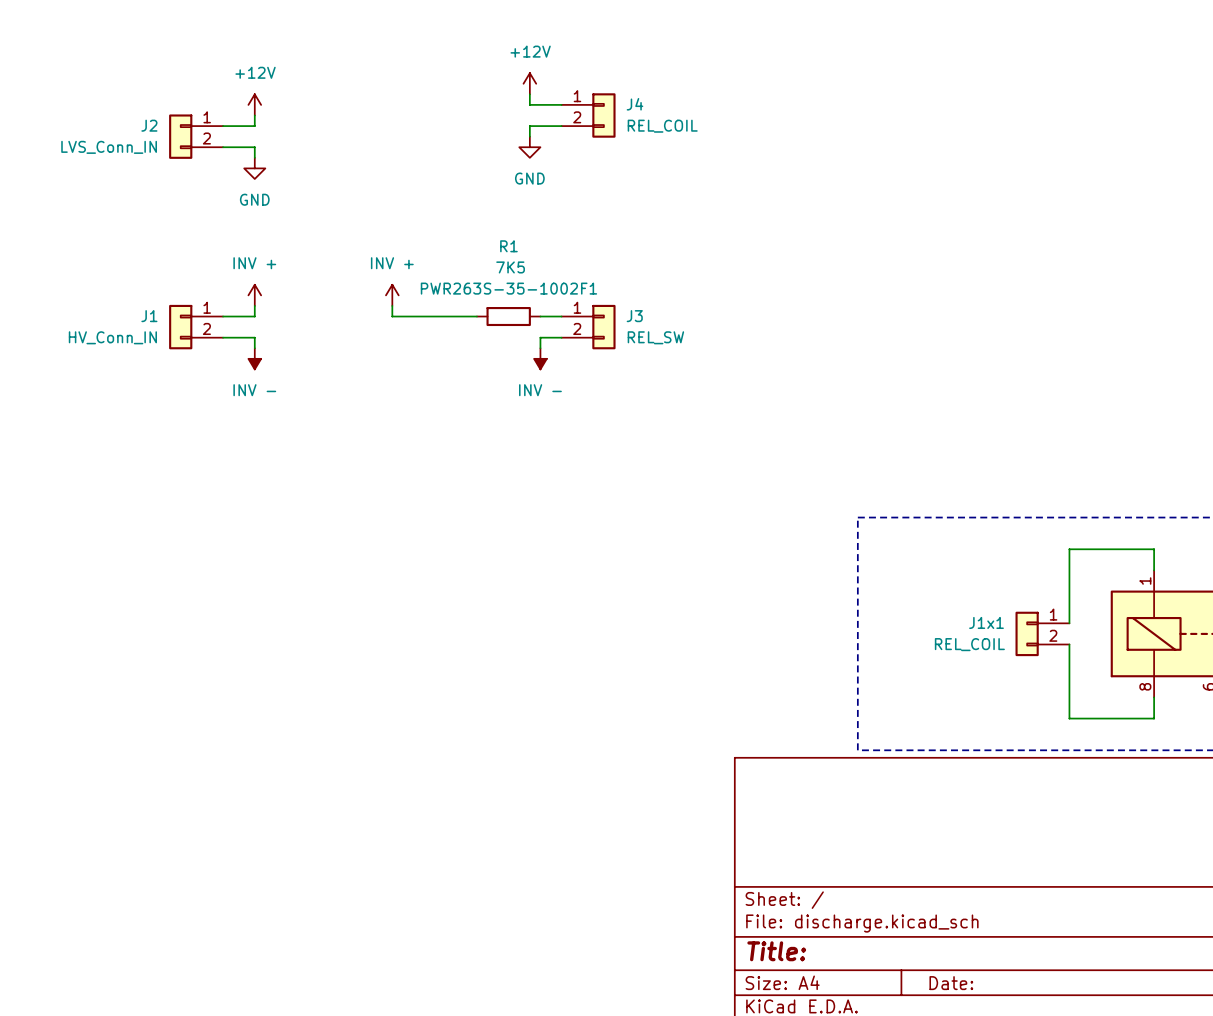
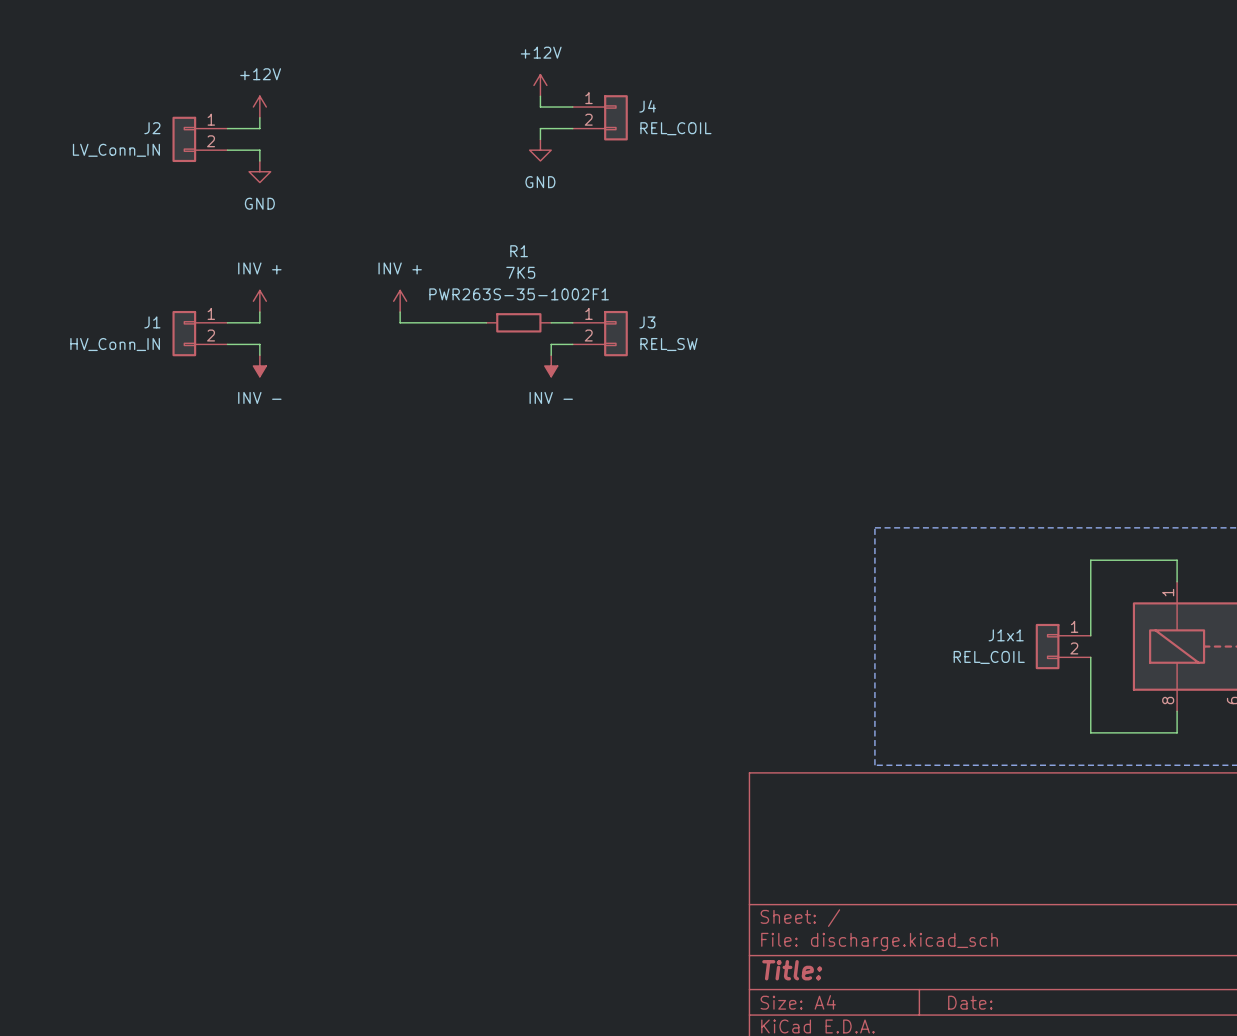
J2 value: LVS_Conn_IN (109, 147) -> LV_Conn_IN (116, 150)

